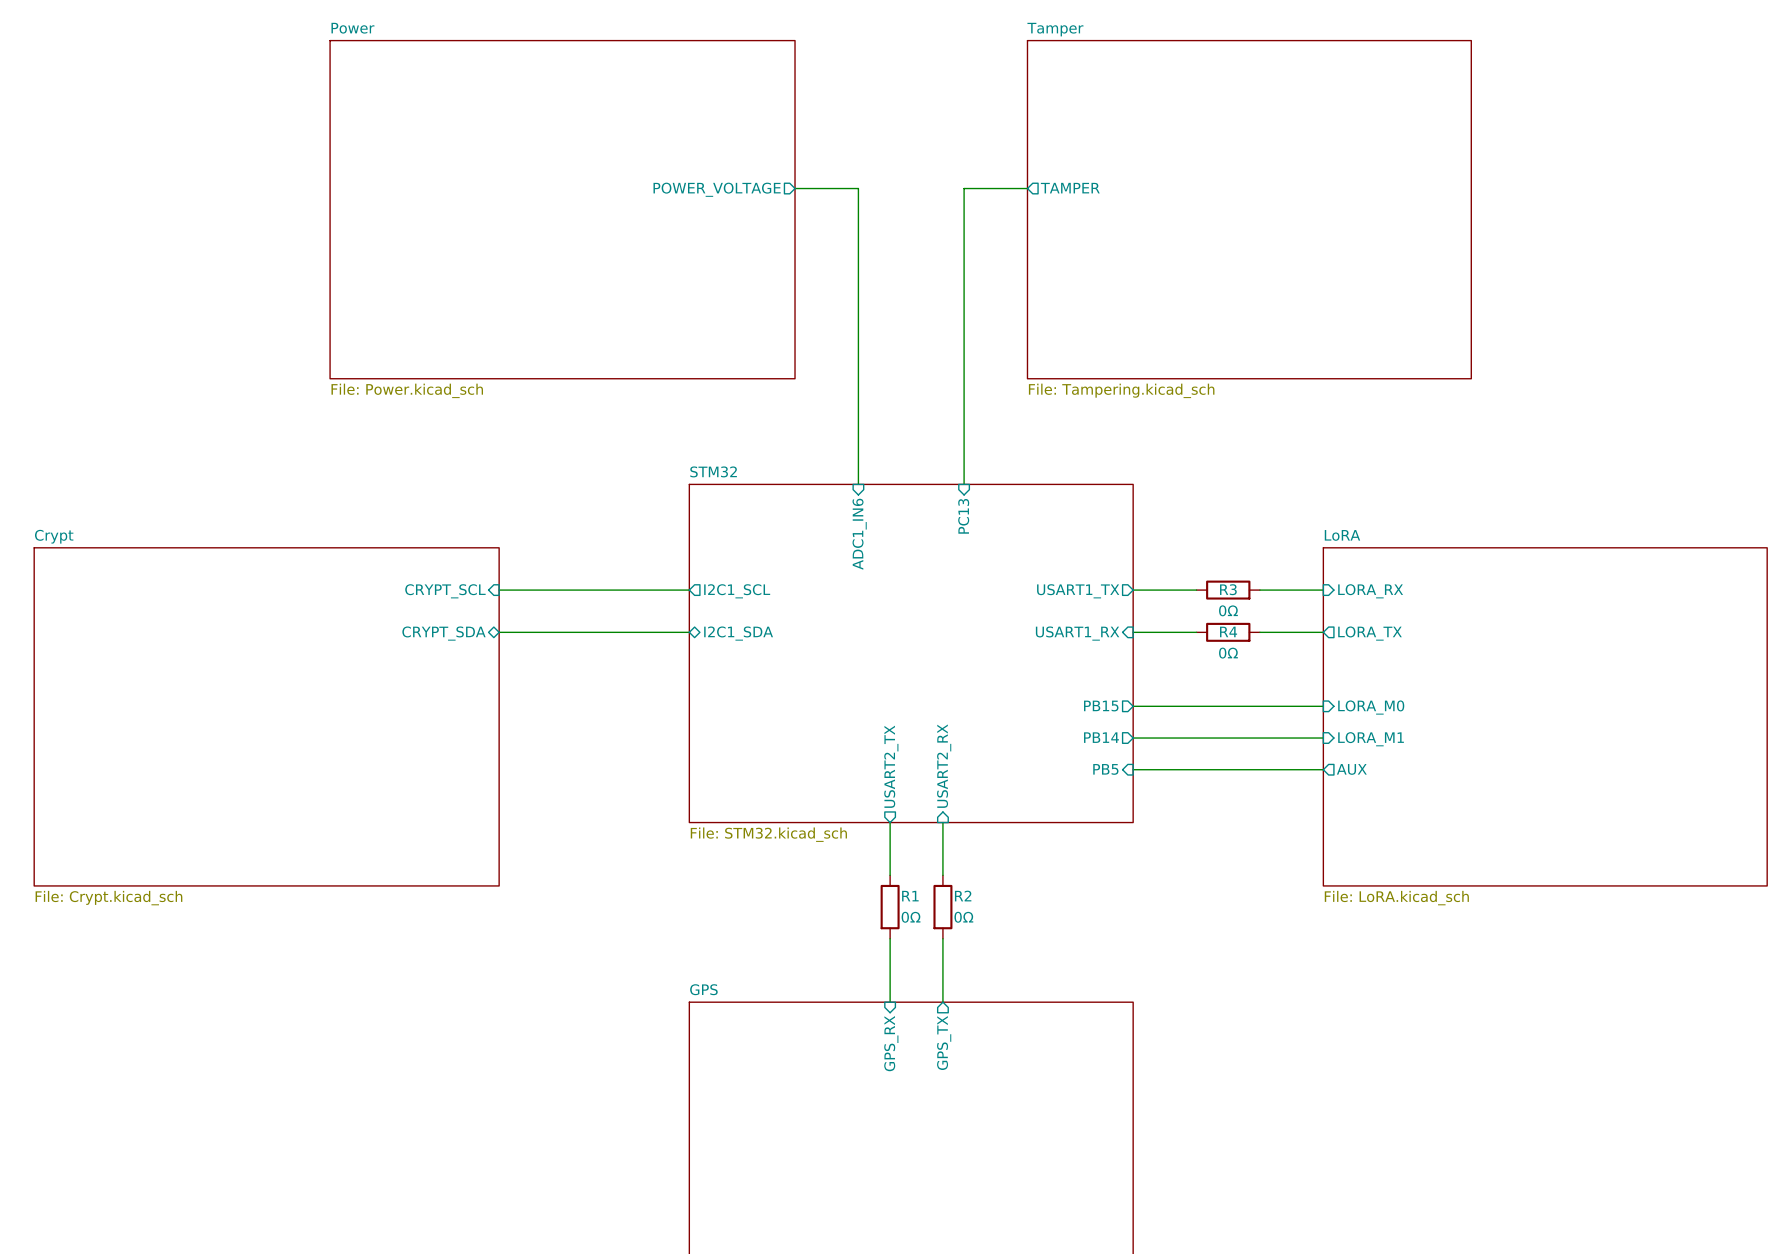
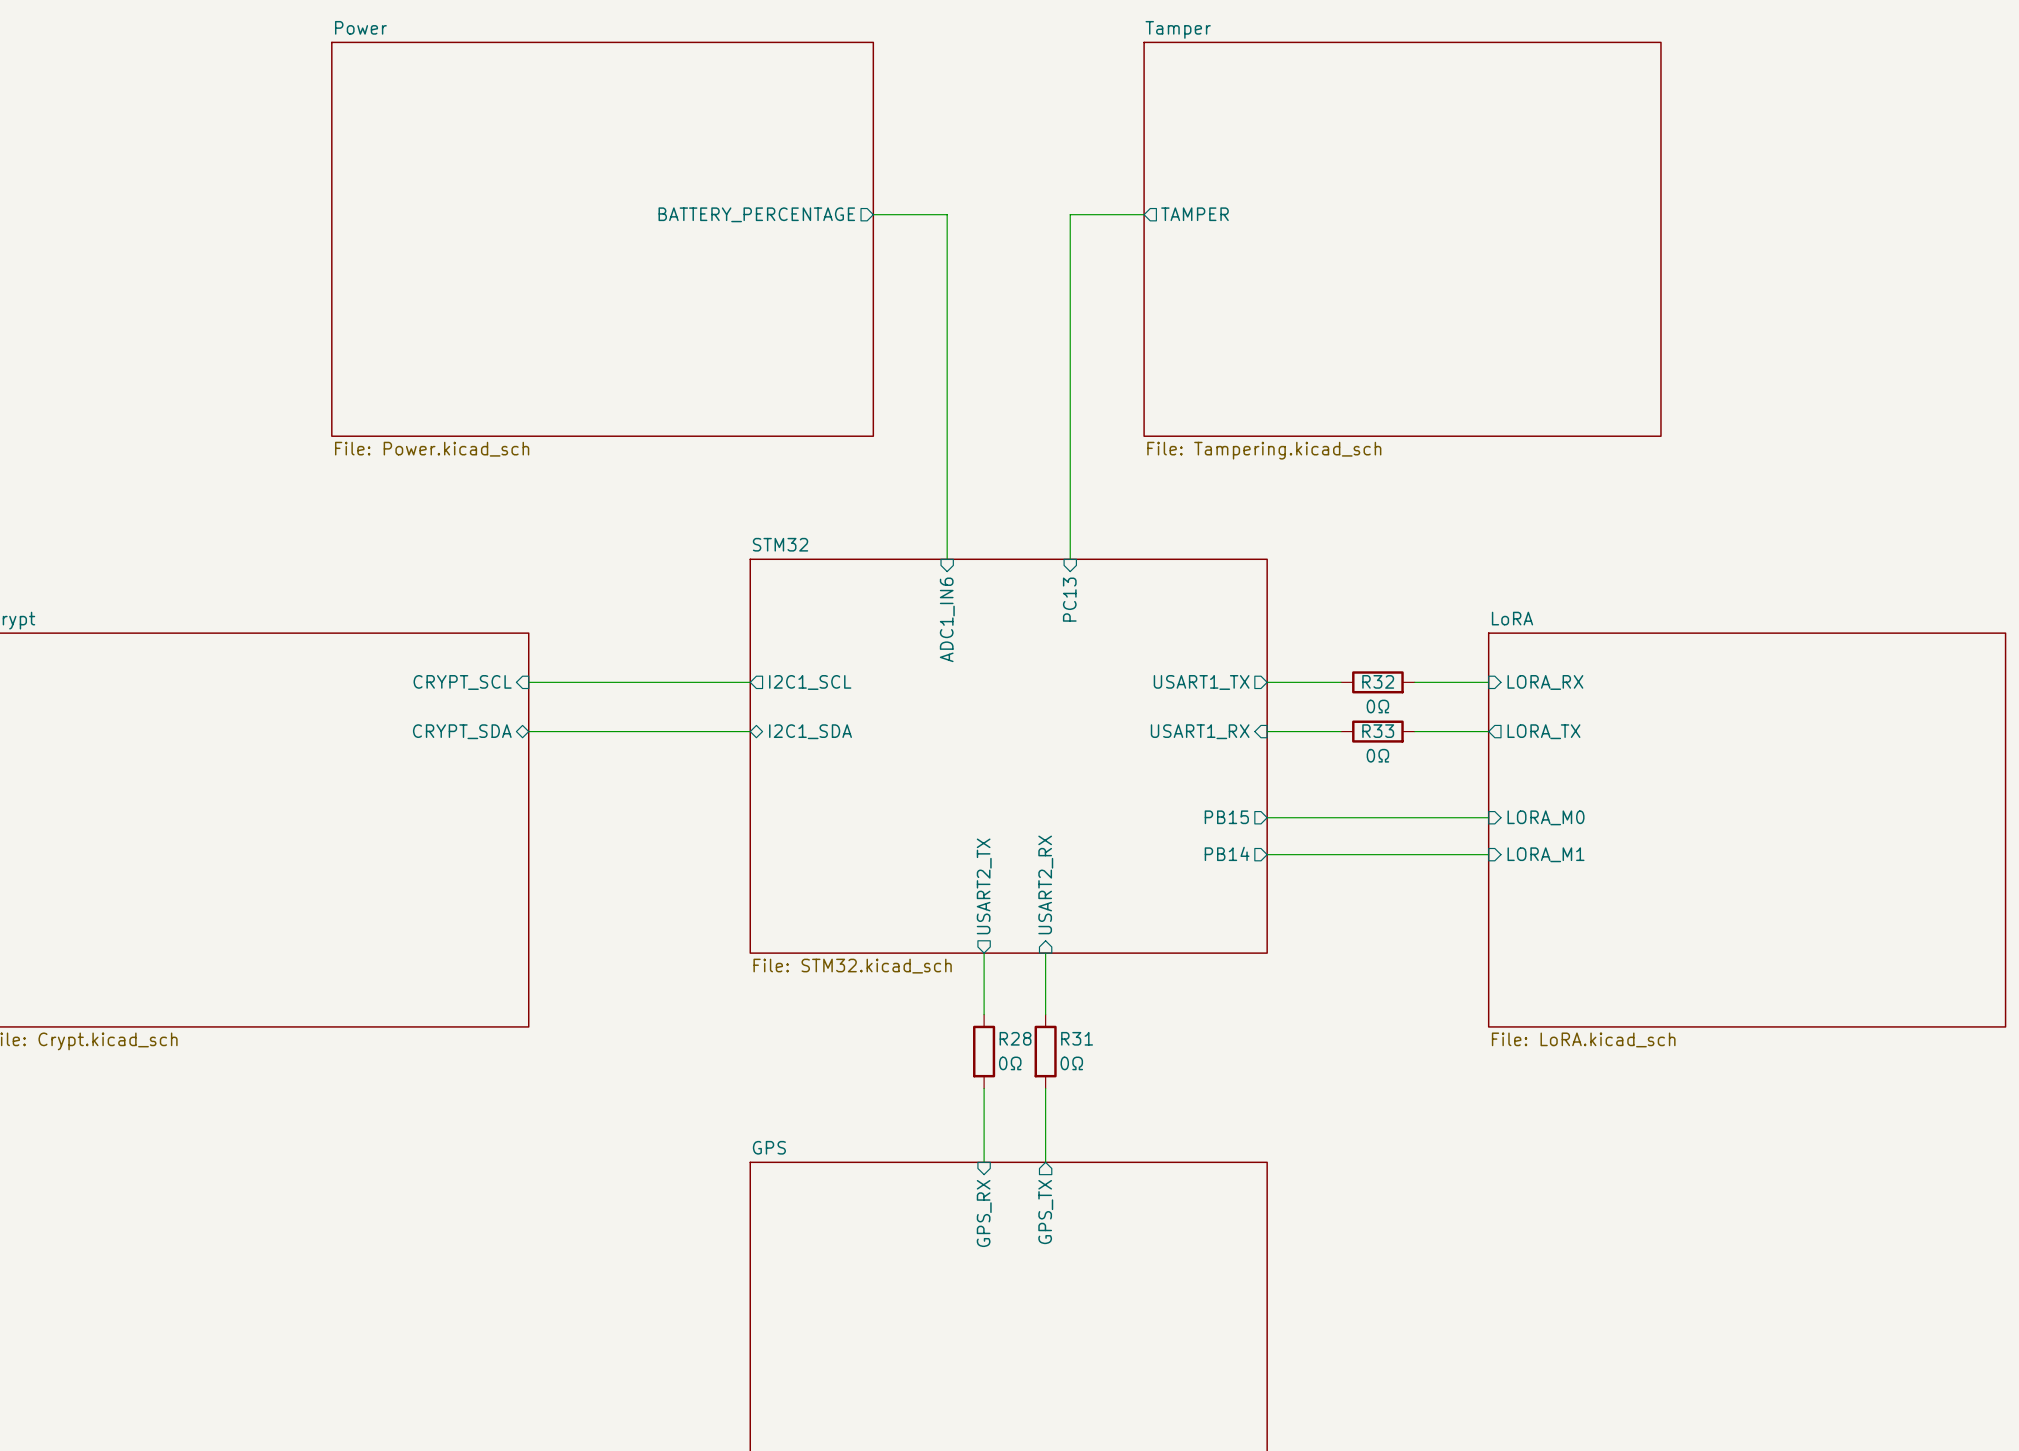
sheet pin: POWER_VOLTAGE (717, 189) -> BATTERY_PERCENTAGE (756, 214)
R3 name: R3 (1228, 589) -> R32 (1378, 681)
R4 name: R4 (1228, 631) -> R33 (1378, 731)
sheet pin: PB5 (1105, 769) -> none
wire: (1133, 769) (1323, 769) -> none
sheet pin: AUX (1351, 769) -> none
R1 name: R1 (910, 896) -> R28 (1015, 1038)
R2 name: R2 (963, 896) -> R31 (1077, 1038)

